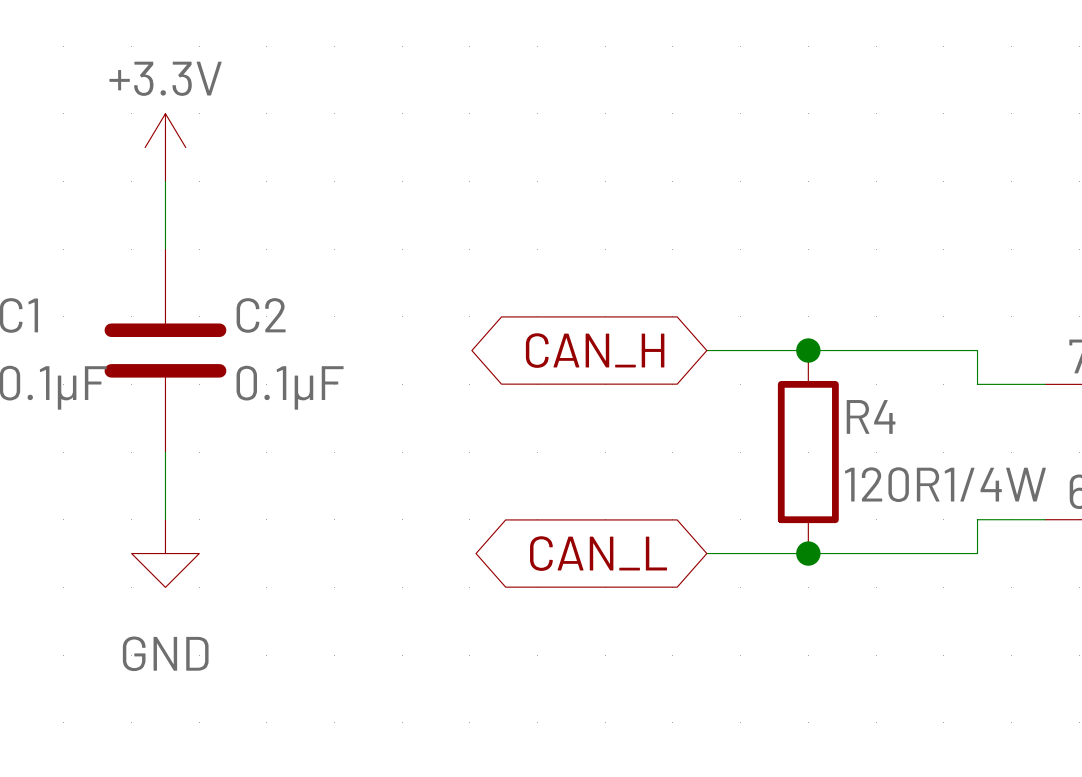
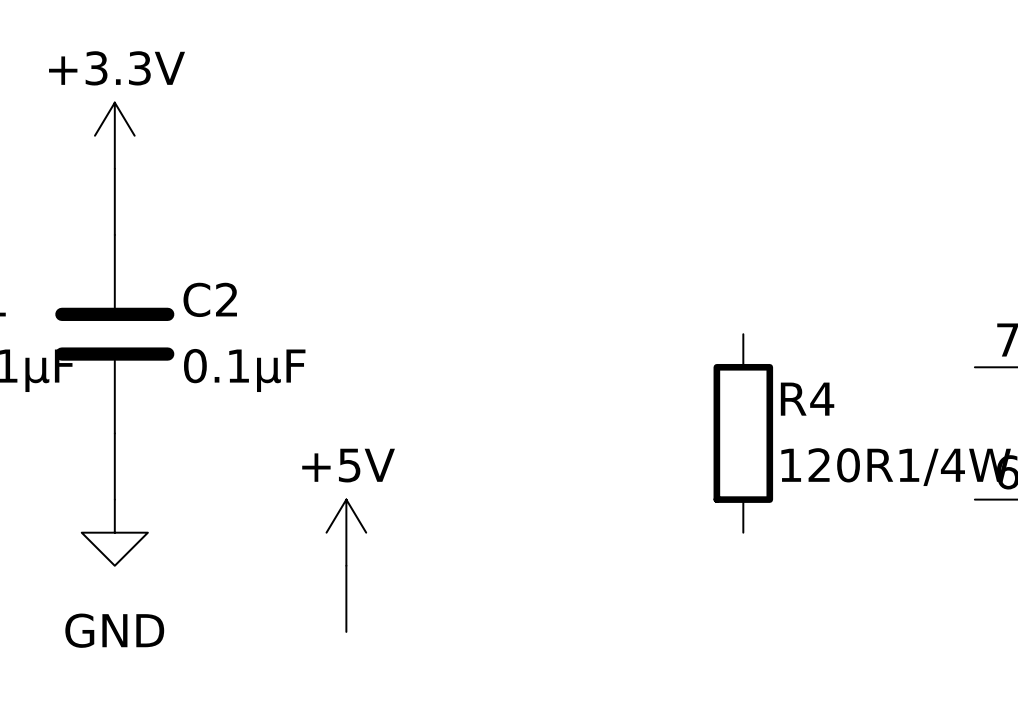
global label: CAN_H (595, 350) -> none
wire: (706, 350) (977, 350) (977, 384) (1045, 384) -> none
junction: (808, 350) -> none
wire: (1045, 519) (977, 519) (977, 553) (706, 553) -> none
power symbol: none -> +5V (346, 532)
global label: CAN_L (598, 553) -> none
junction: (808, 553) -> none
wire: none -> (346, 565) (346, 631)

